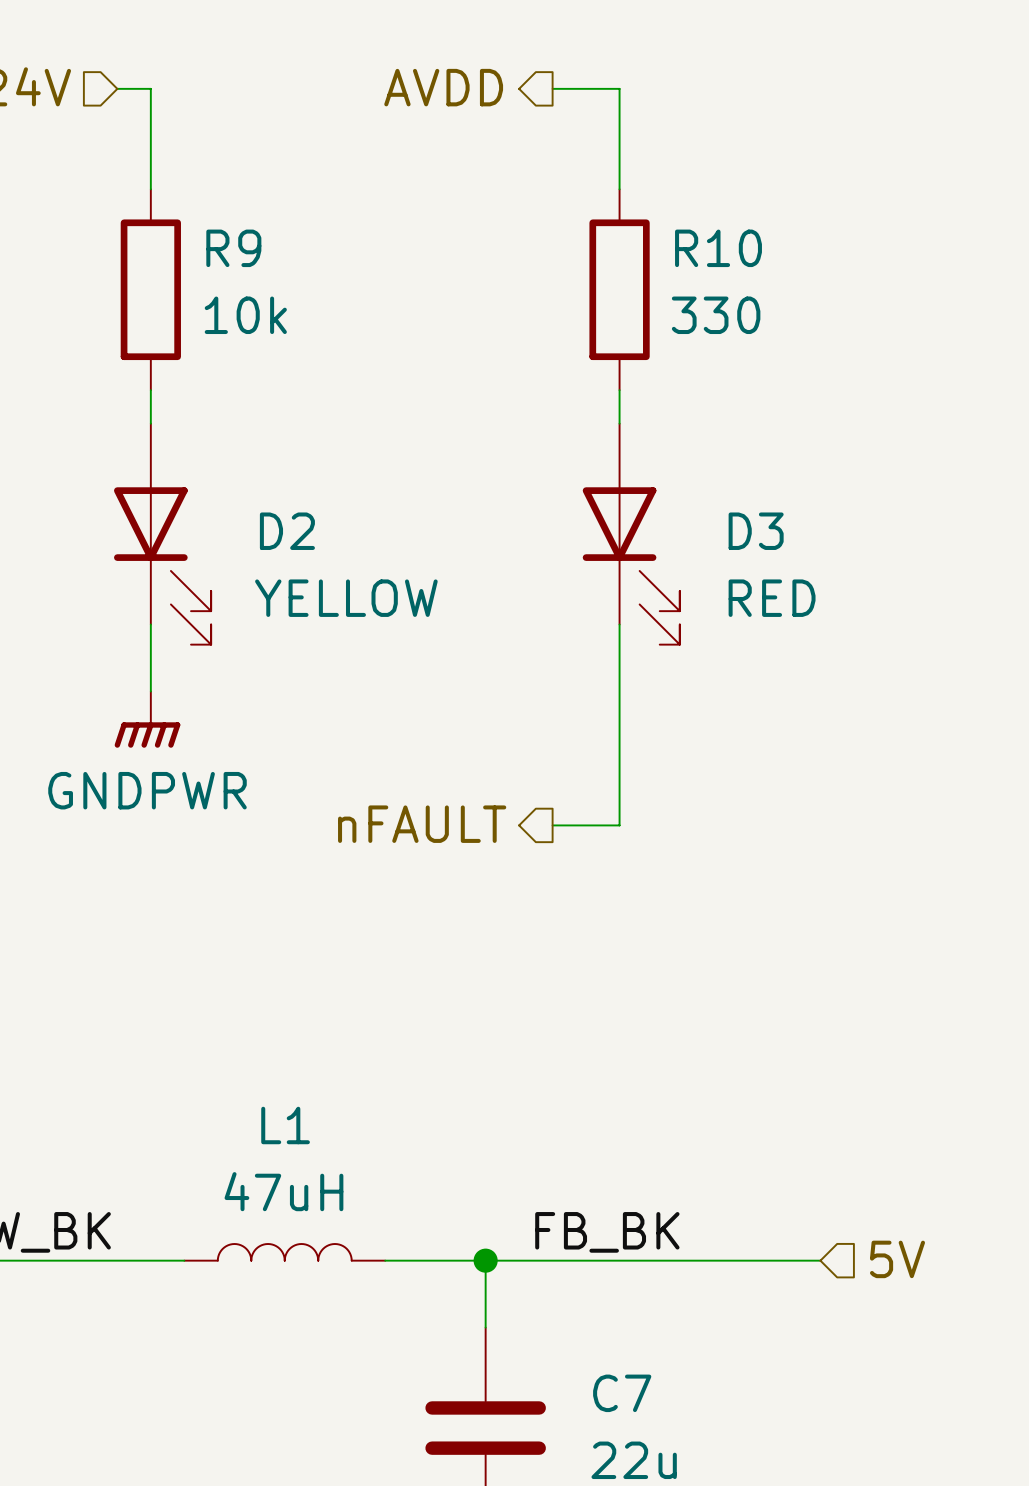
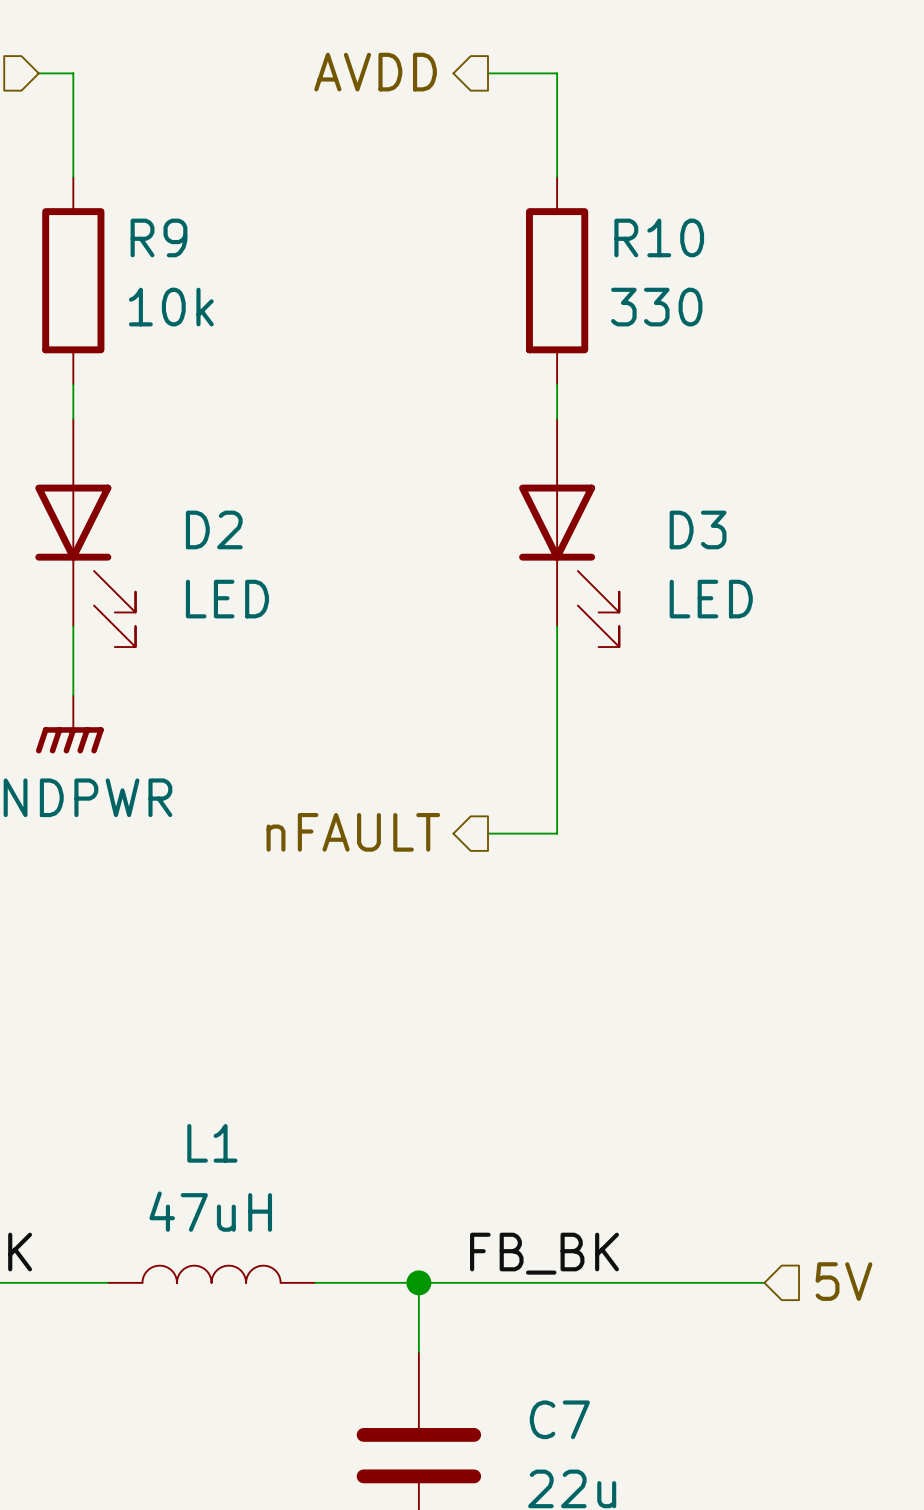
D2 value: YELLOW (346, 598) -> LED (227, 599)
D3 value: RED (772, 598) -> LED (711, 599)

